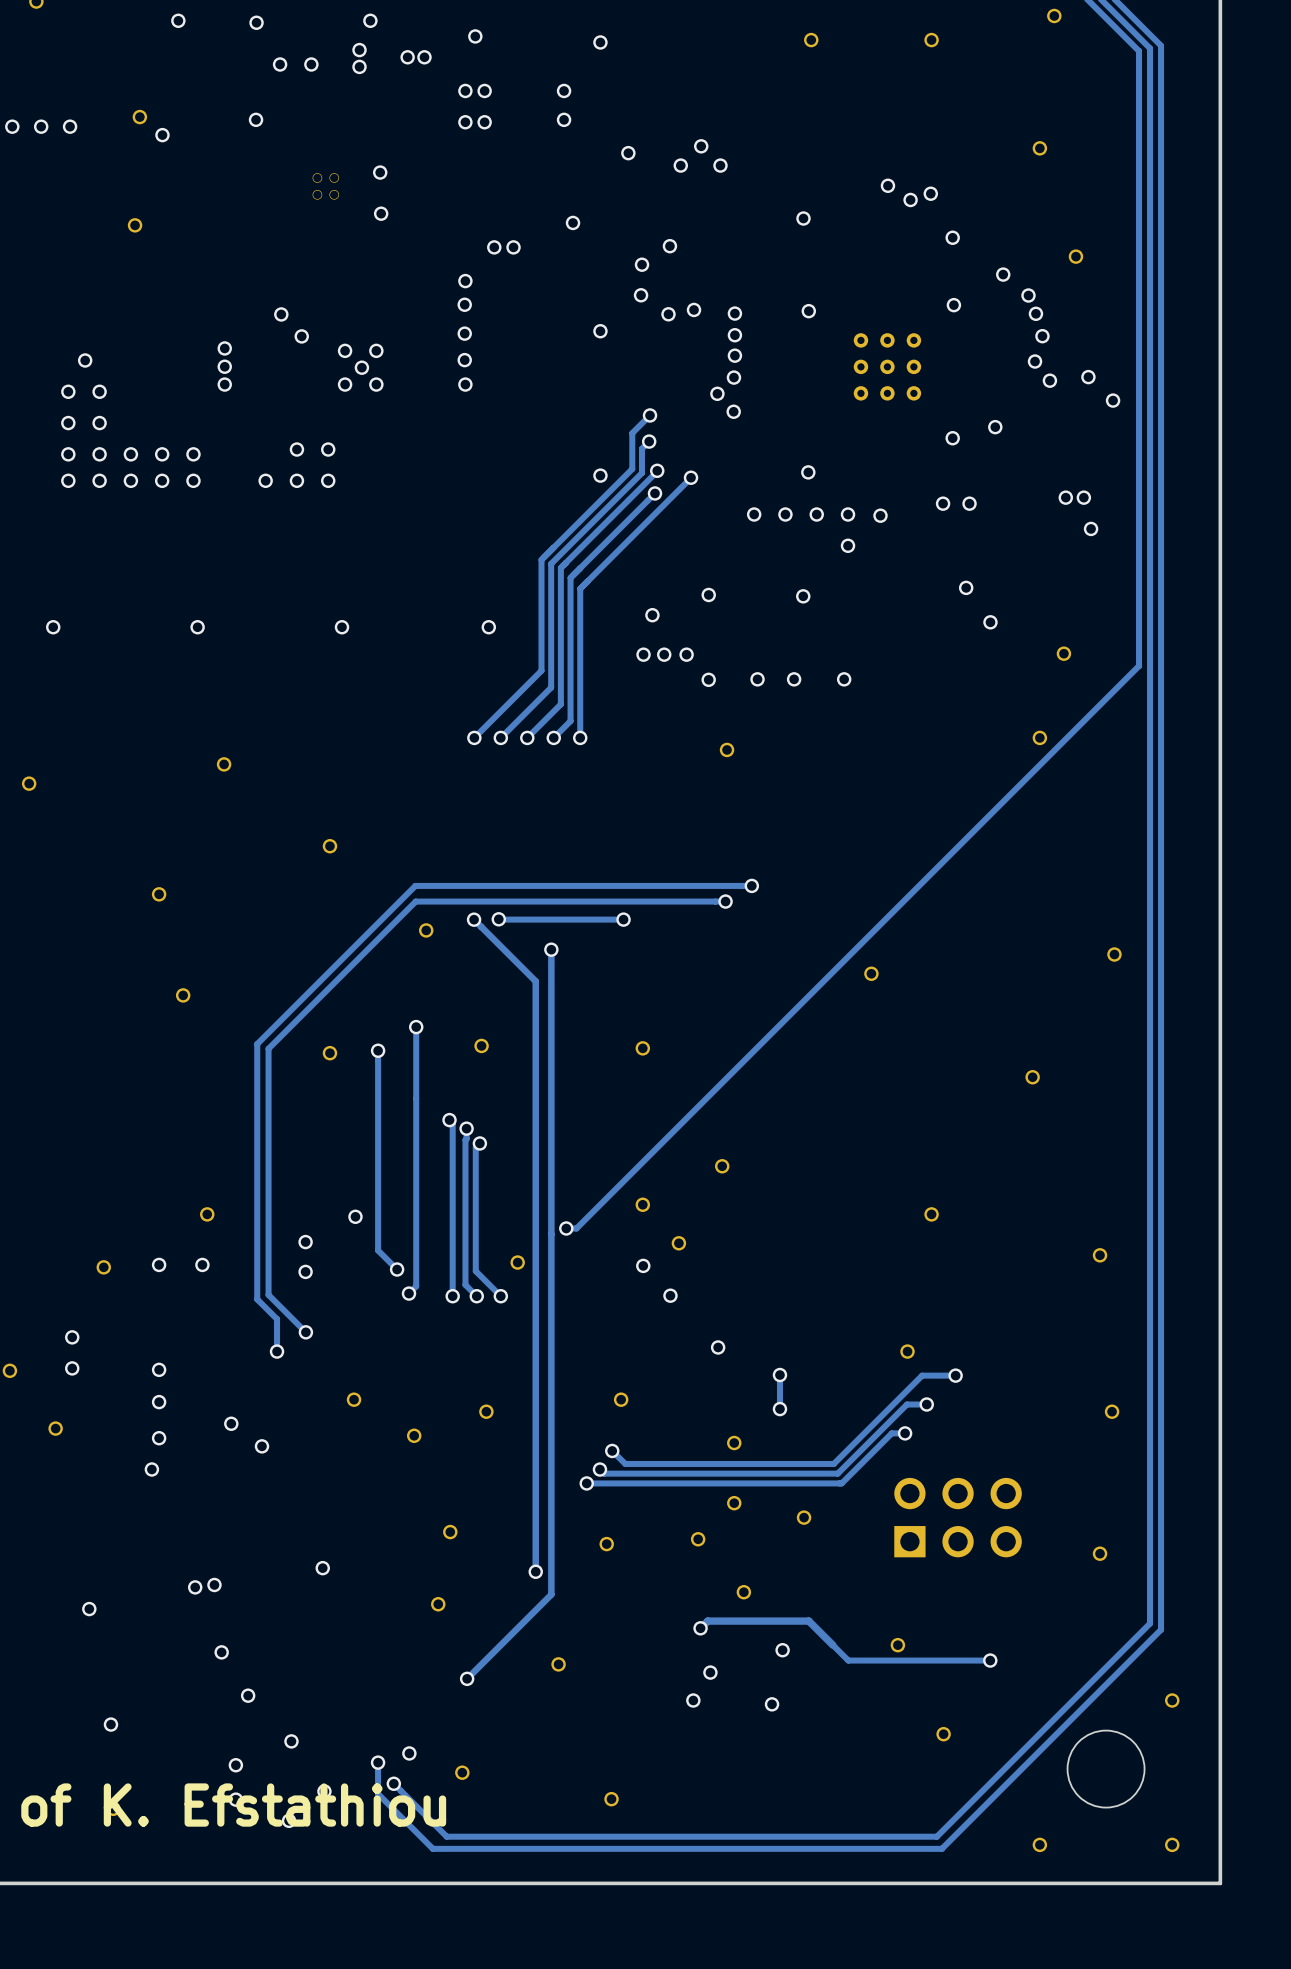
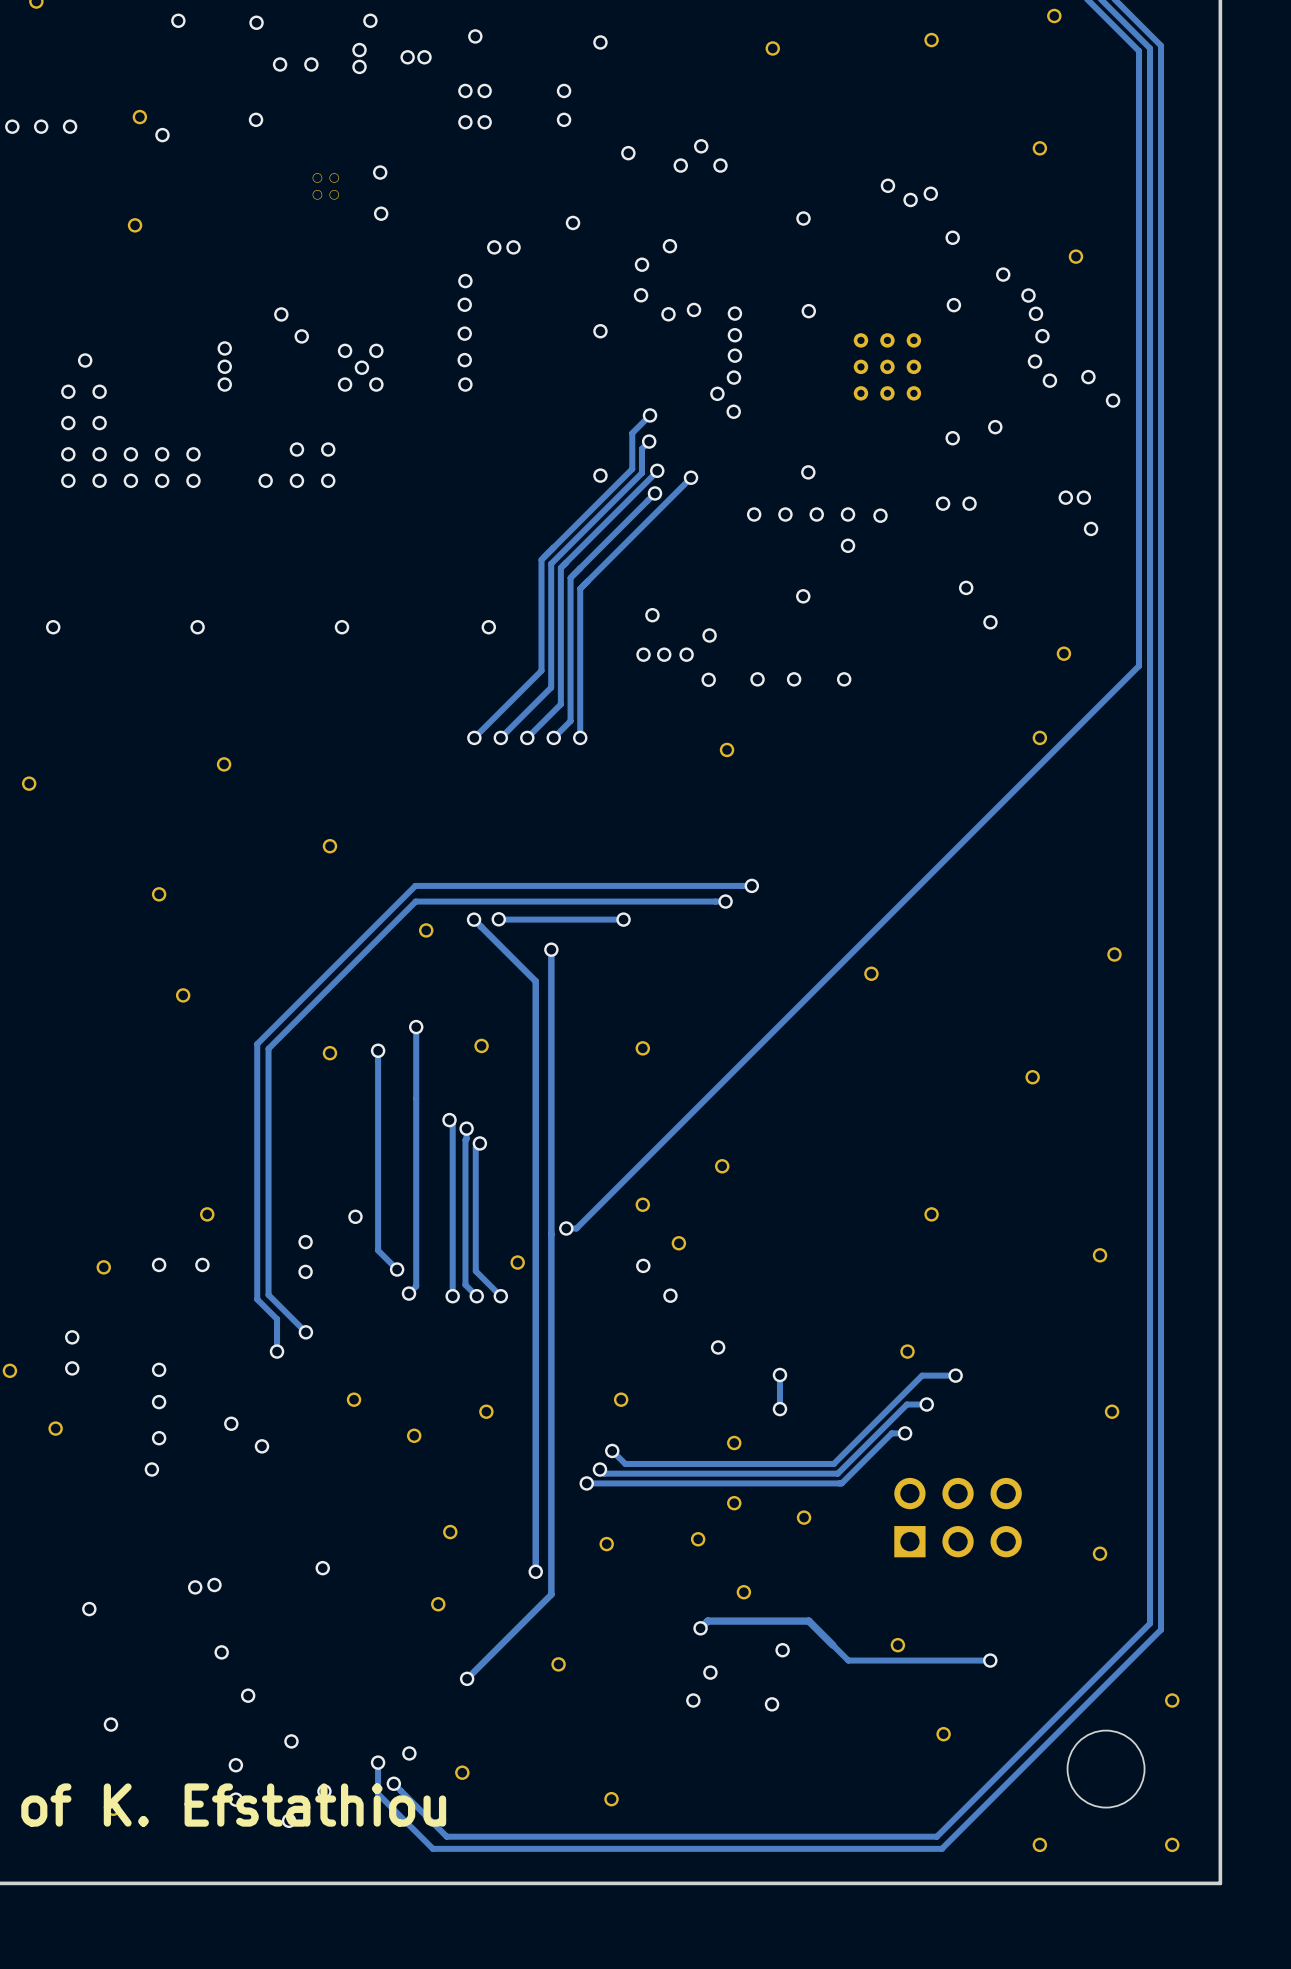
part position: (811, 40) -> (772, 48)
via position: (708, 594) -> (709, 635)

